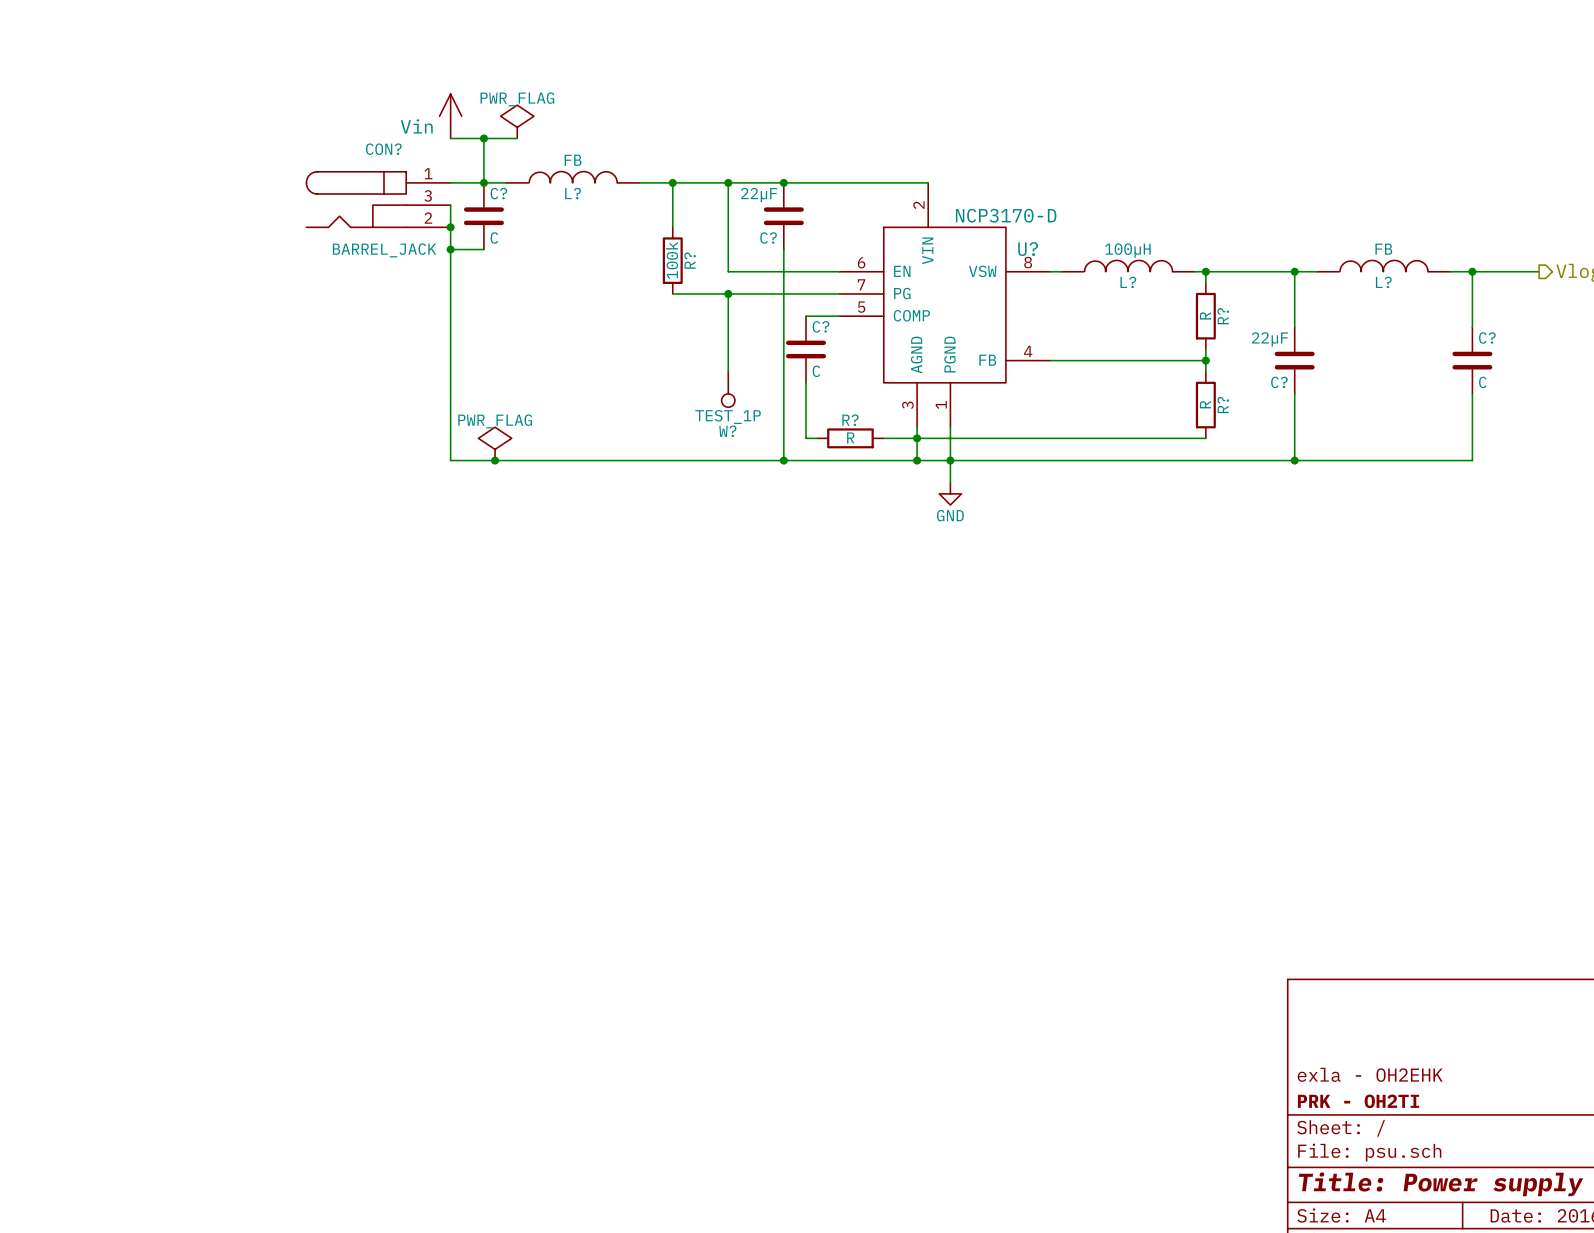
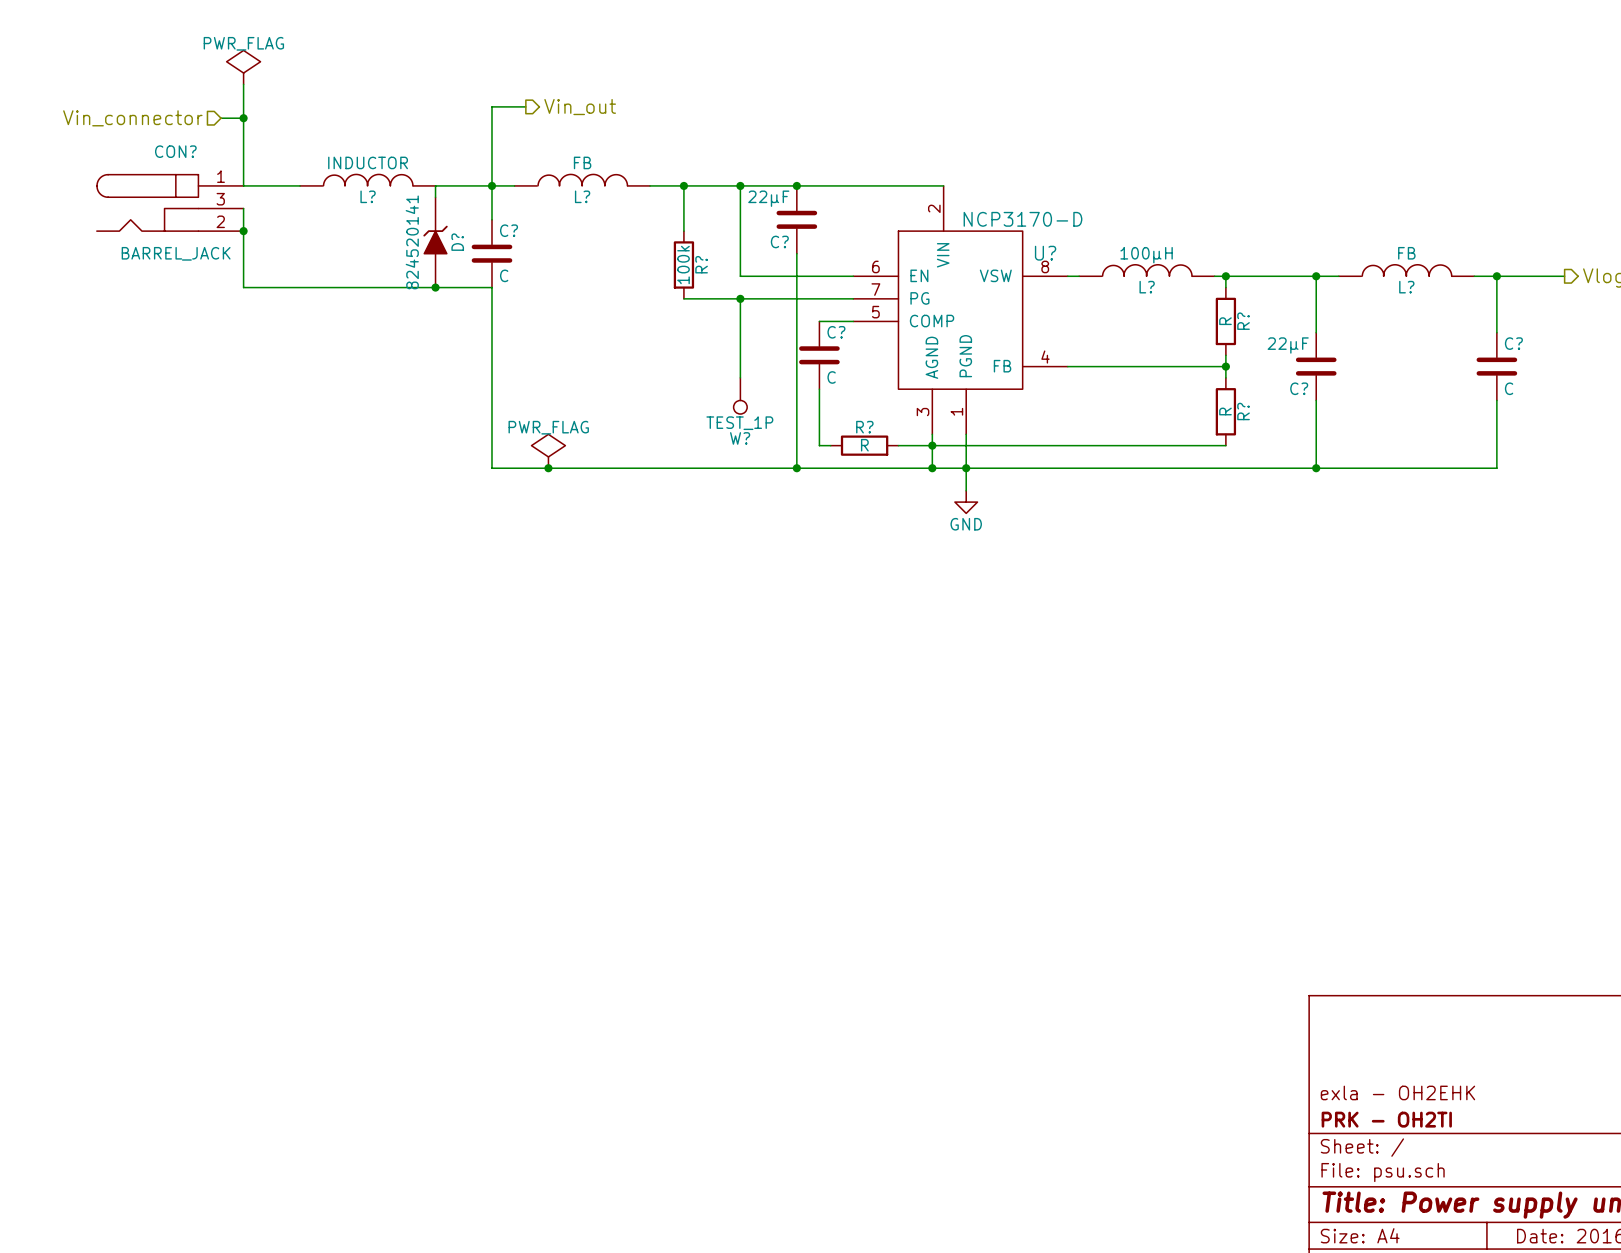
power symbol: none -> PWR_FLAG (243, 67)
wire: none -> (243, 84) (243, 185) (300, 185)
wire: none -> (525, 106) (491, 106) (491, 140)
hierarchical label: none -> Vin_out (580, 107)
hierarchical label: none -> Vin_connector (132, 118)
wire: none -> (221, 118) (243, 118)
junction: none -> (243, 118)
power symbol: Vin (450, 116) -> none
power symbol: PWR_FLAG (517, 121) -> none
wire: (450, 138) (517, 138) -> none
junction: (483, 138) -> none
L?: none -> INDUCTOR (367, 180)
CON? position: (378, 199) -> (170, 202)
wire: (450, 205) (450, 460) (483, 460) -> (243, 208) (243, 287) (491, 287) (491, 468)
C? position: (483, 216) -> (491, 253)
junction: none -> (243, 231)
junction: (450, 227) -> none
D?: none -> 824520141 (435, 242)
wire: (450, 249) (483, 249) -> none
junction: (450, 249) -> none
junction: none -> (435, 287)
power symbol position: PWR_FLAG (495, 443) -> PWR_FLAG (548, 451)
junction position: (495, 460) -> (548, 468)

